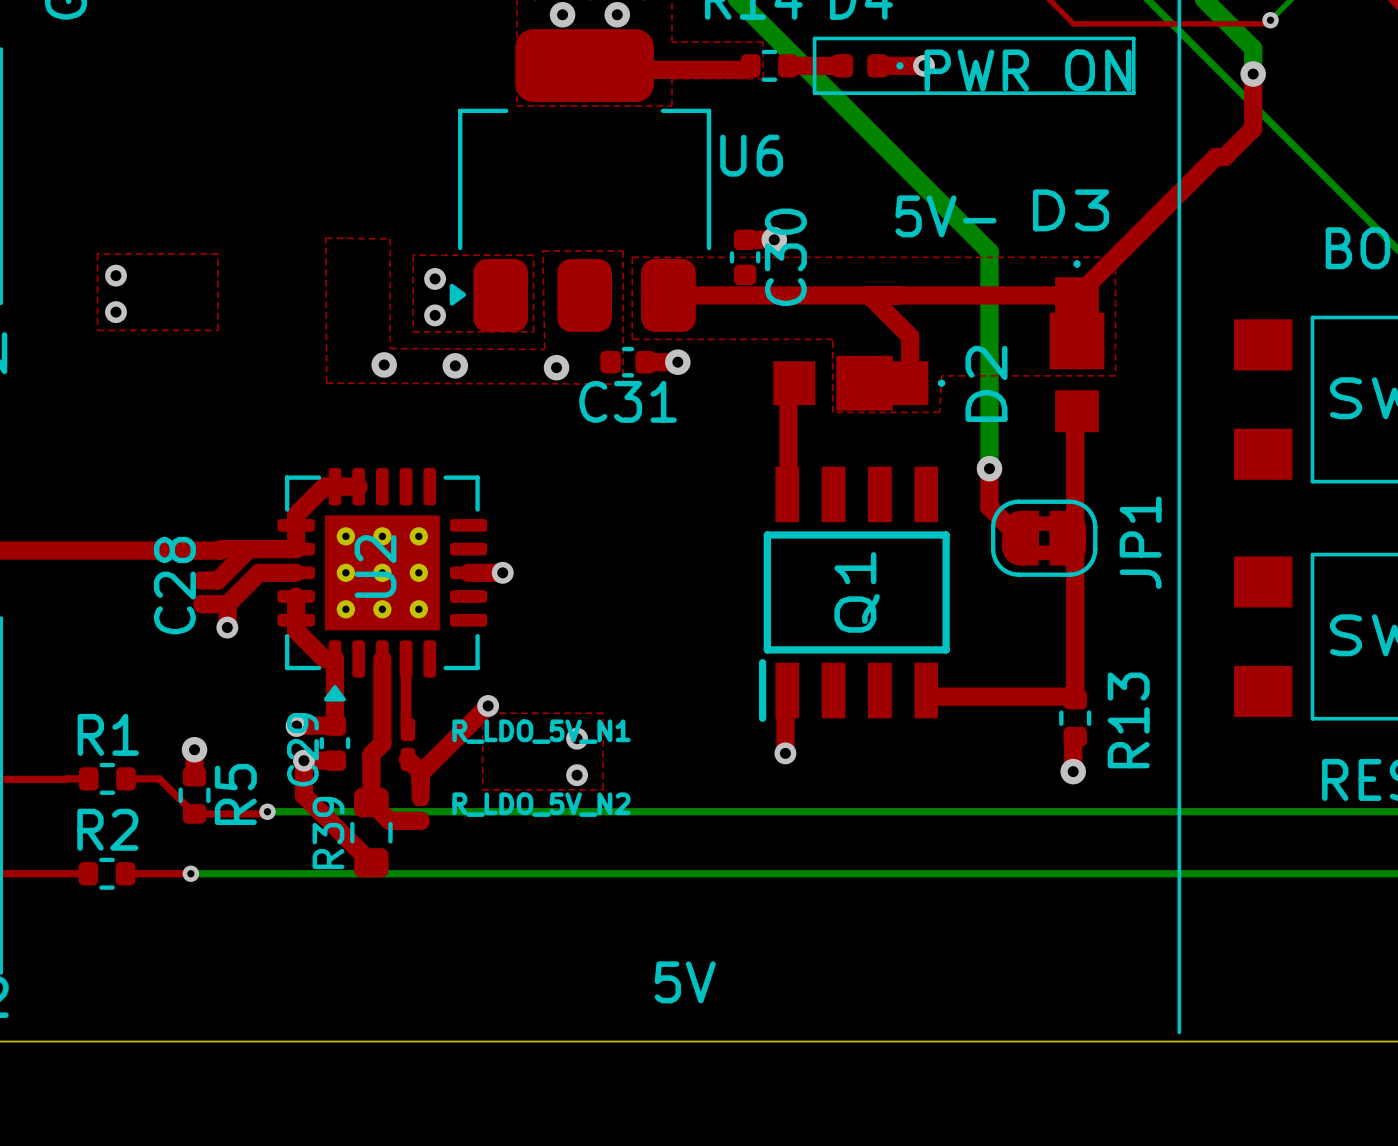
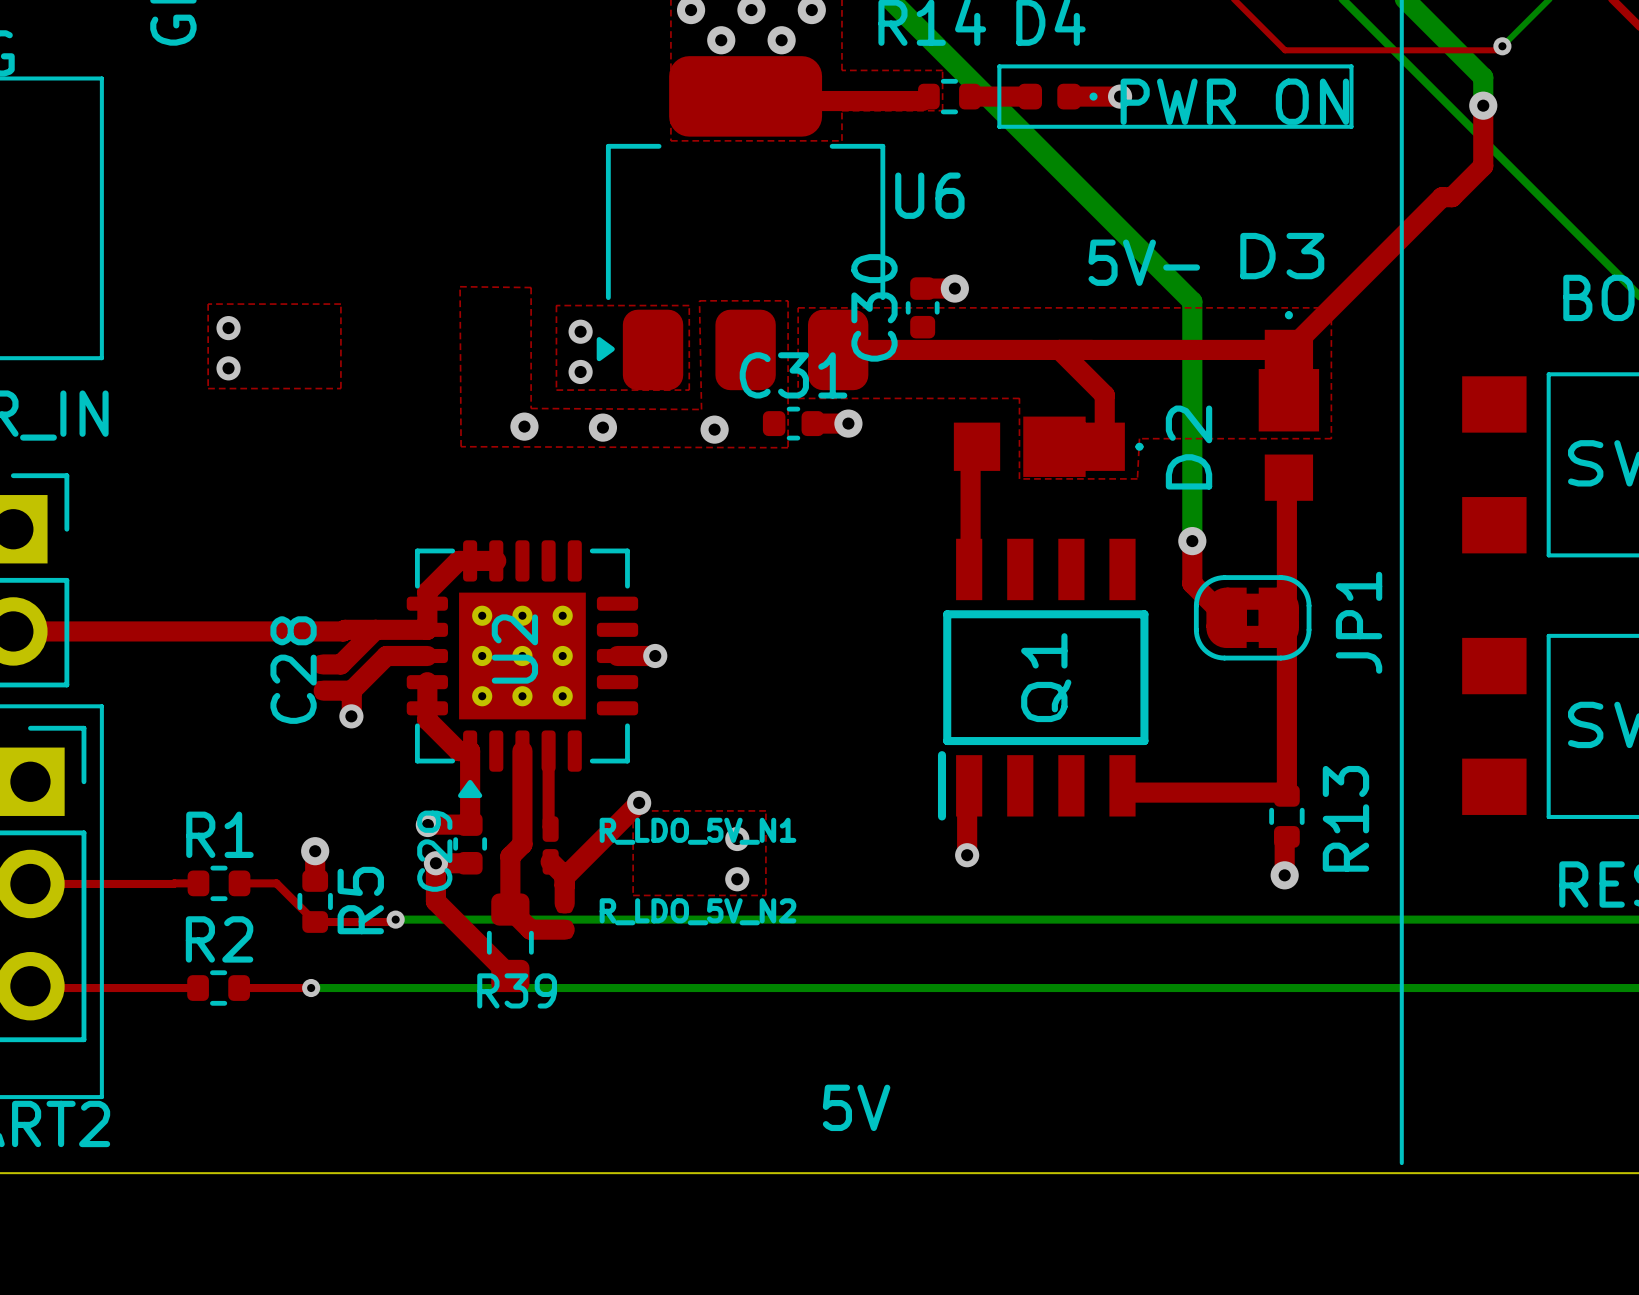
C30 name position: C30 (785, 257) -> C30 (874, 307)
C31 name position: C31 (628, 401) -> C31 (793, 375)
R39 name rotation: 0° (328, 832) -> 90° clockwise (517, 990)

